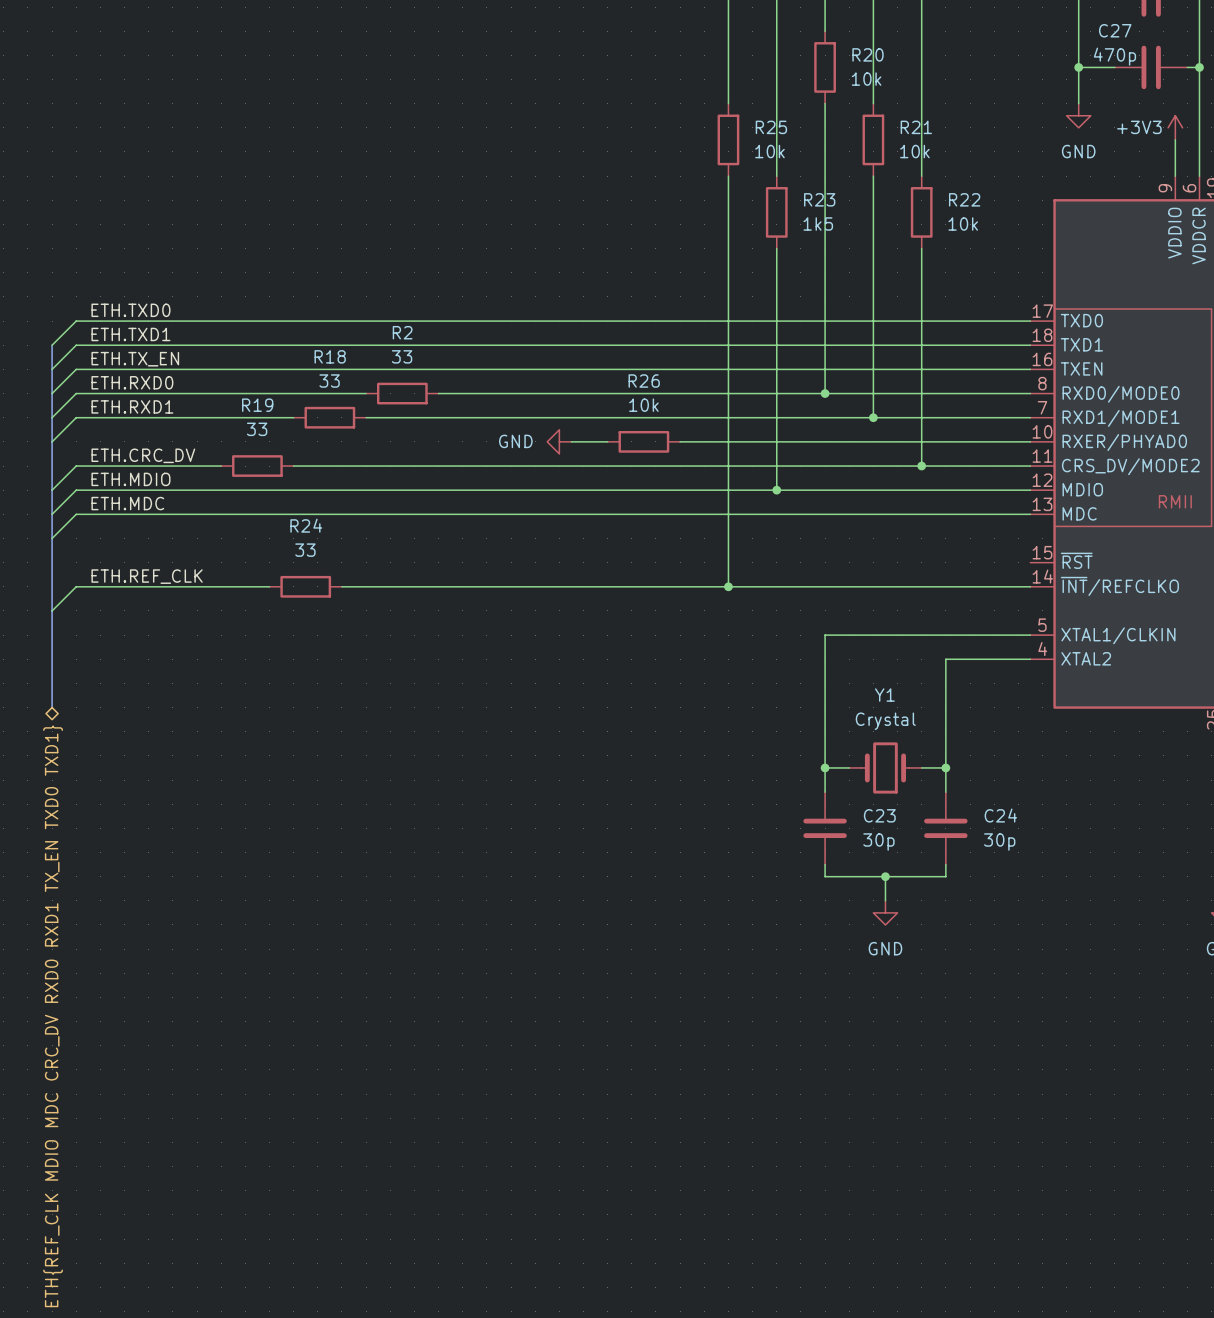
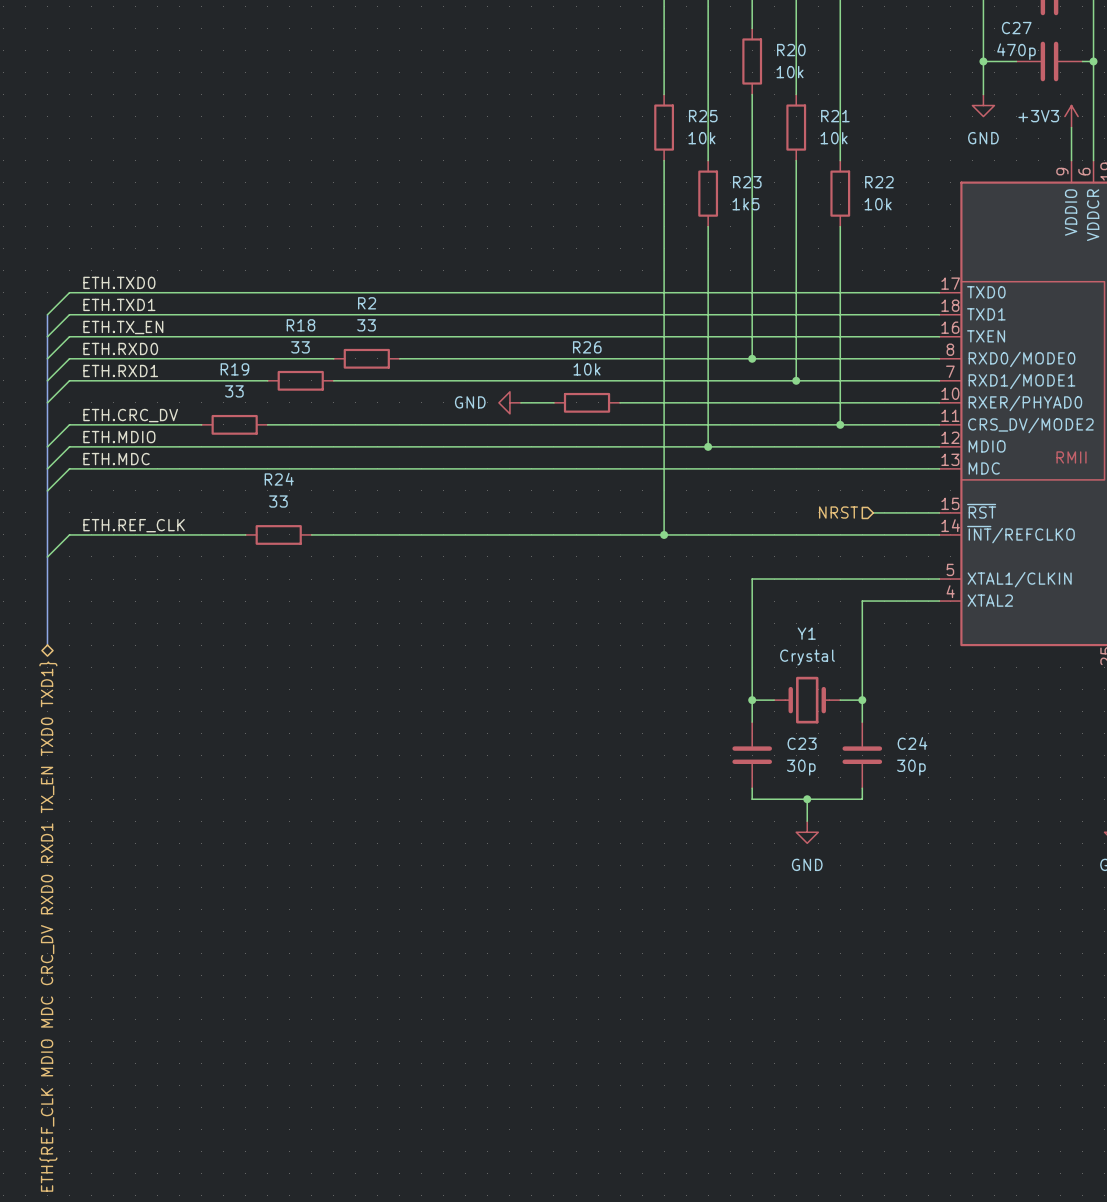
hierarchical label: none -> NRST (838, 512)
wire: none -> (873, 512) (939, 512)

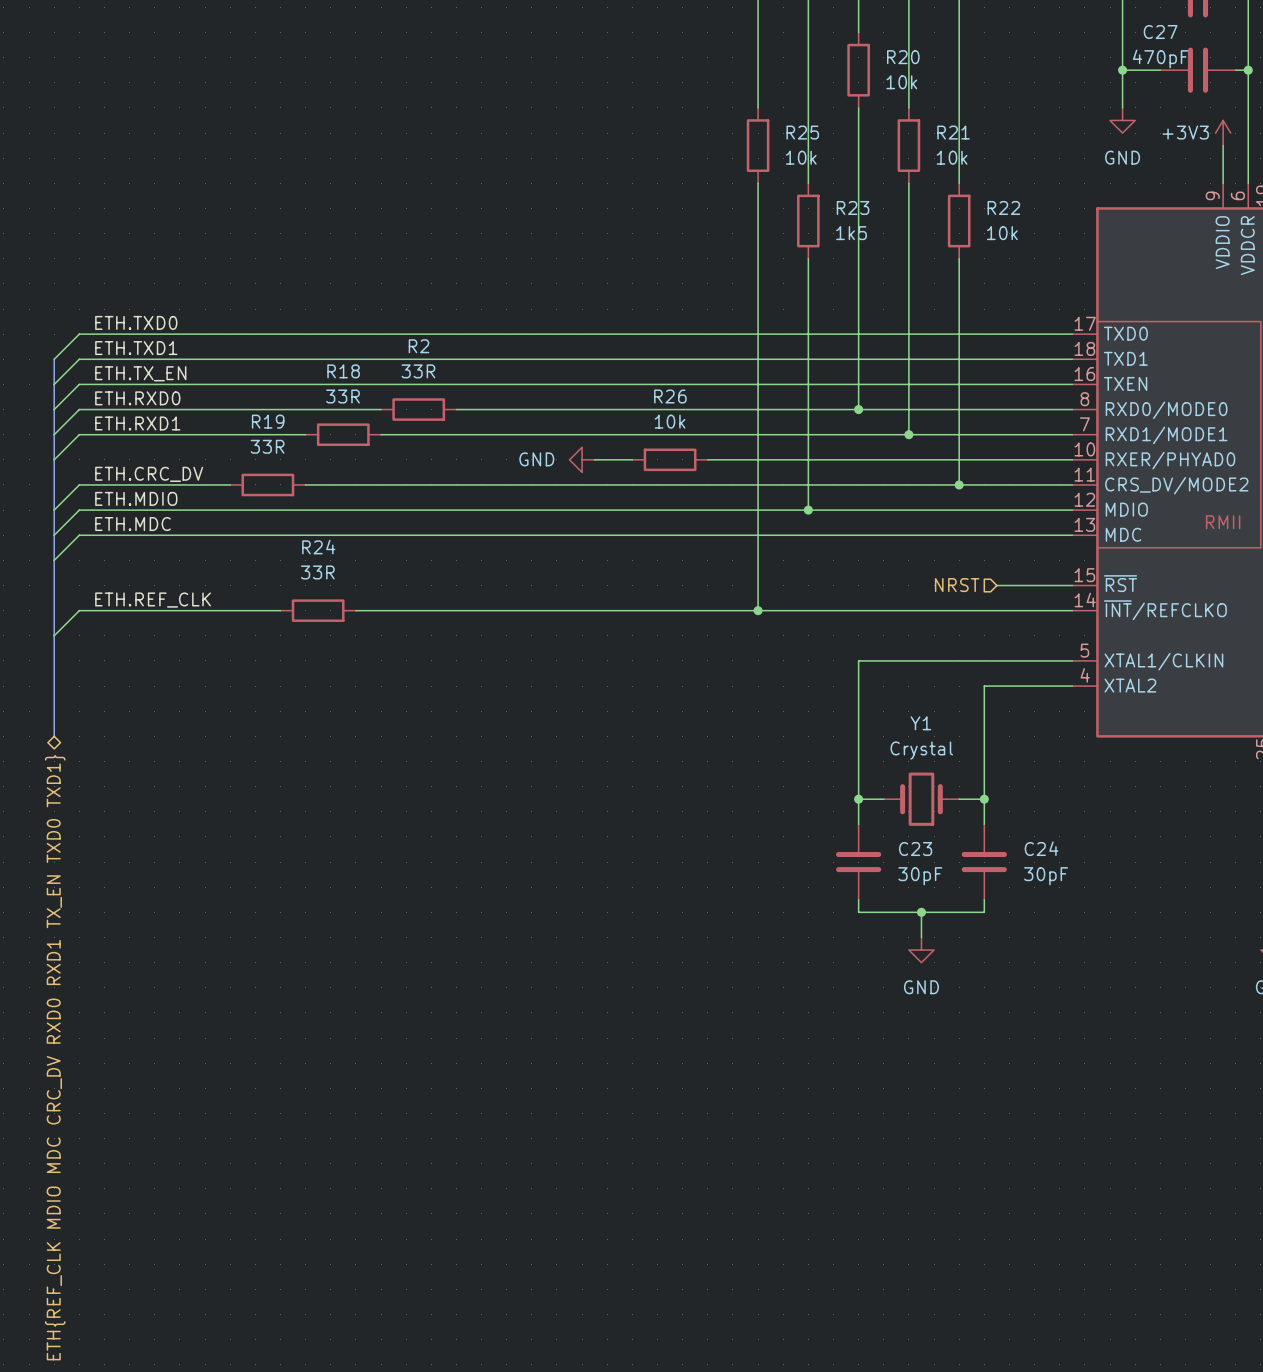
C27 value: 470p (1016, 51) -> 470pF (1160, 58)
R2 value: 33 (366, 325) -> 33R (418, 371)
R18 value: 33 (300, 347) -> 33R (342, 396)
R19 value: 33 (234, 391) -> 33R (267, 446)
R24 value: 33 (278, 501) -> 33R (317, 572)
C23 value: 30p (801, 767) -> 30pF (920, 876)
C24 value: 30p (911, 767) -> 30pF (1046, 876)

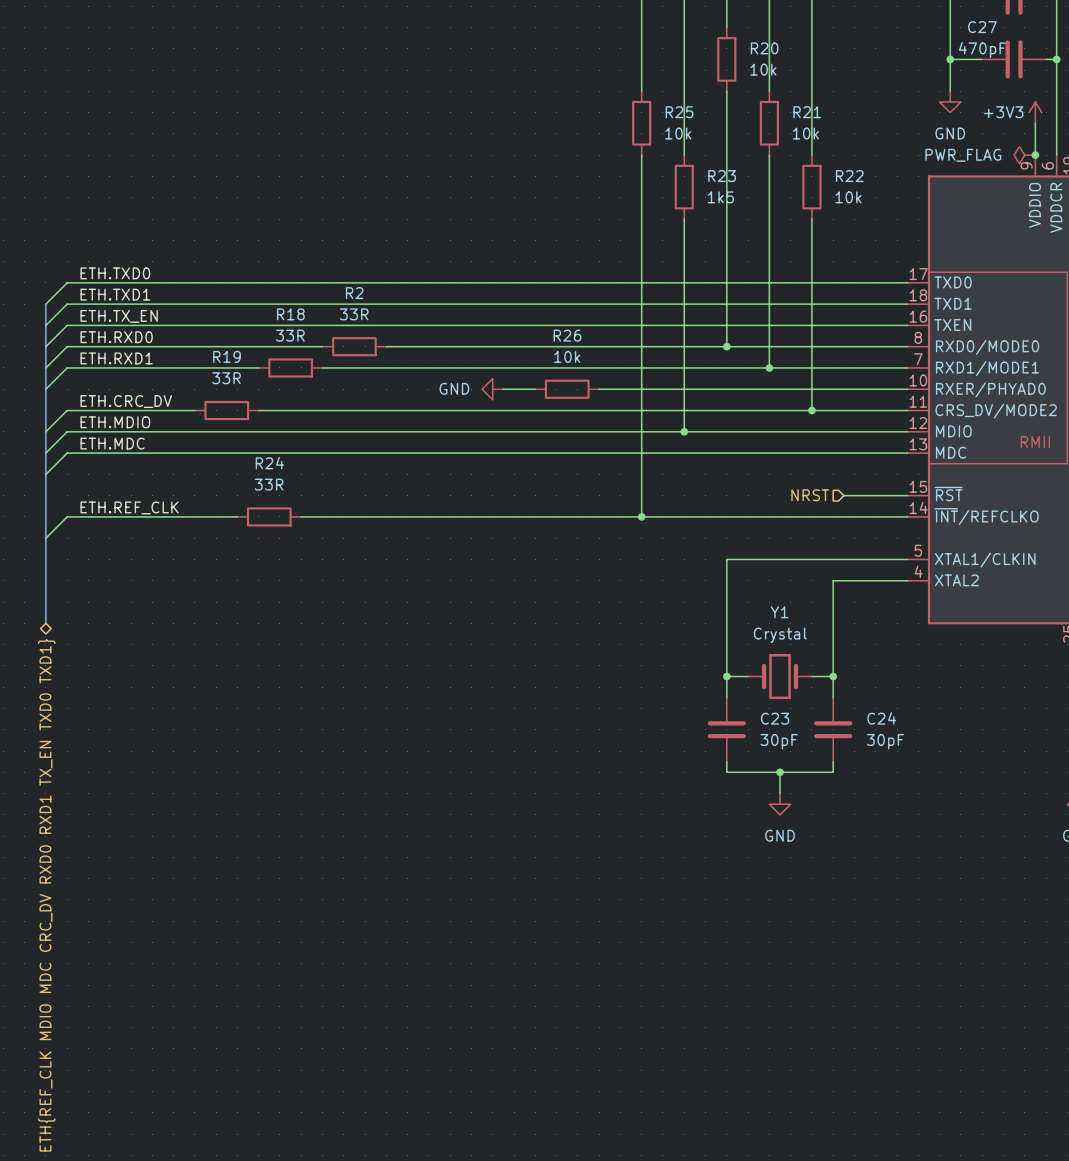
power symbol: none -> PWR_FLAG (1024, 155)
junction: none -> (1035, 155)

